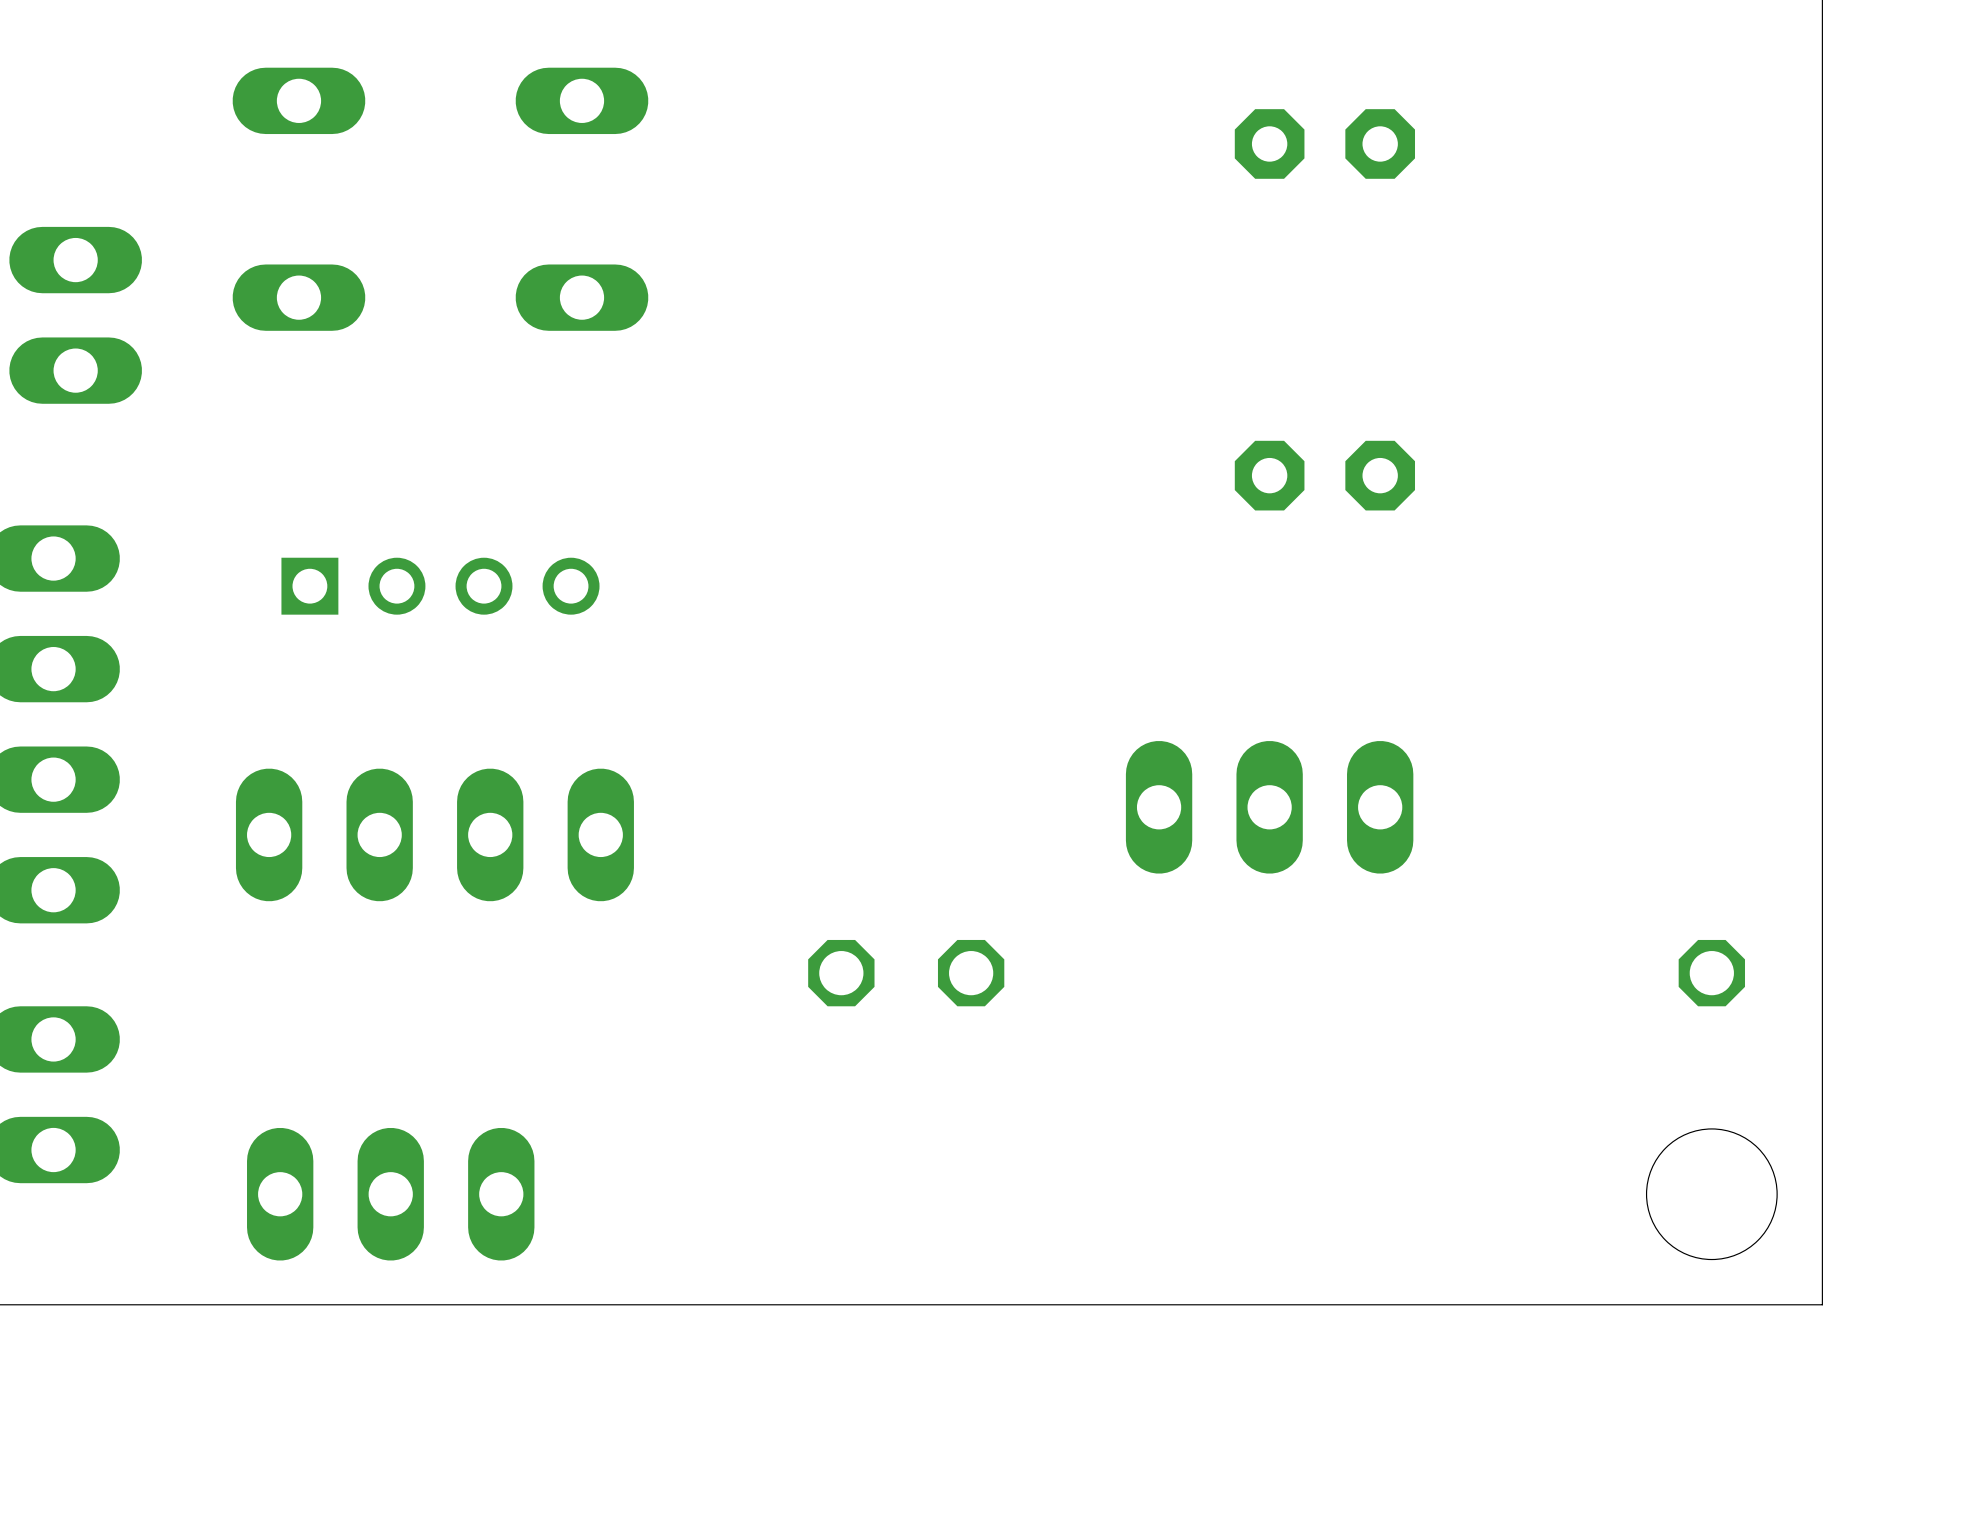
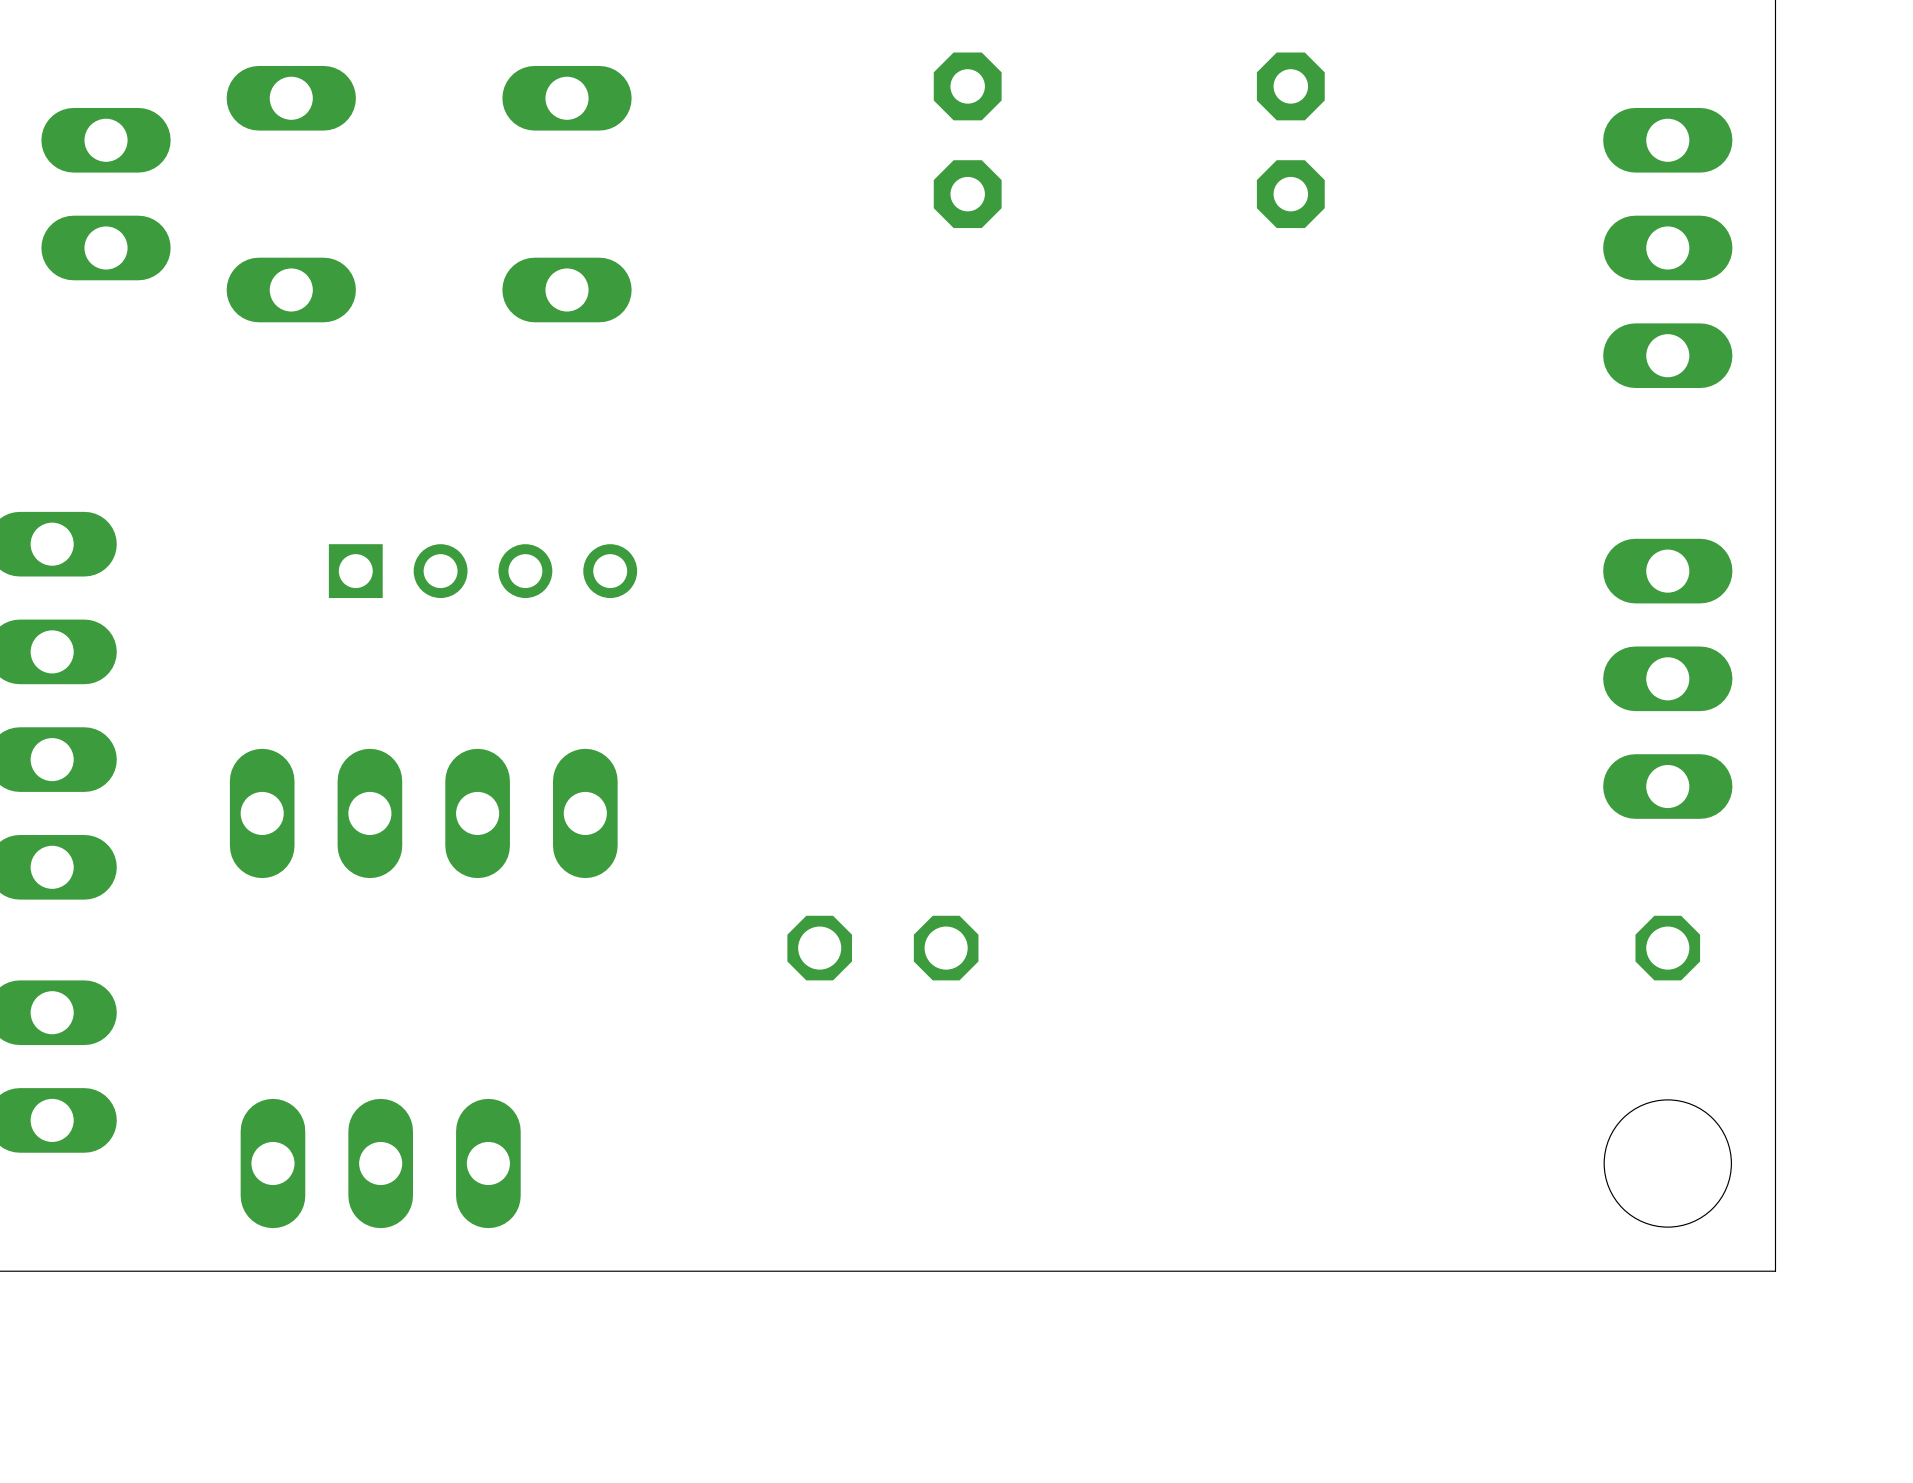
part rotation: 0° (1324, 143) -> 90° clockwise (1290, 140)
part: none -> (1667, 247)
part position: (75, 315) -> (106, 194)
part rotation: 0° (1324, 475) -> 90° clockwise (967, 140)
part position: (1324, 475) -> (967, 140)
part: (440, 586) -> none
part: none -> (483, 571)
part: none -> (1667, 678)
part: (1269, 807) -> none

